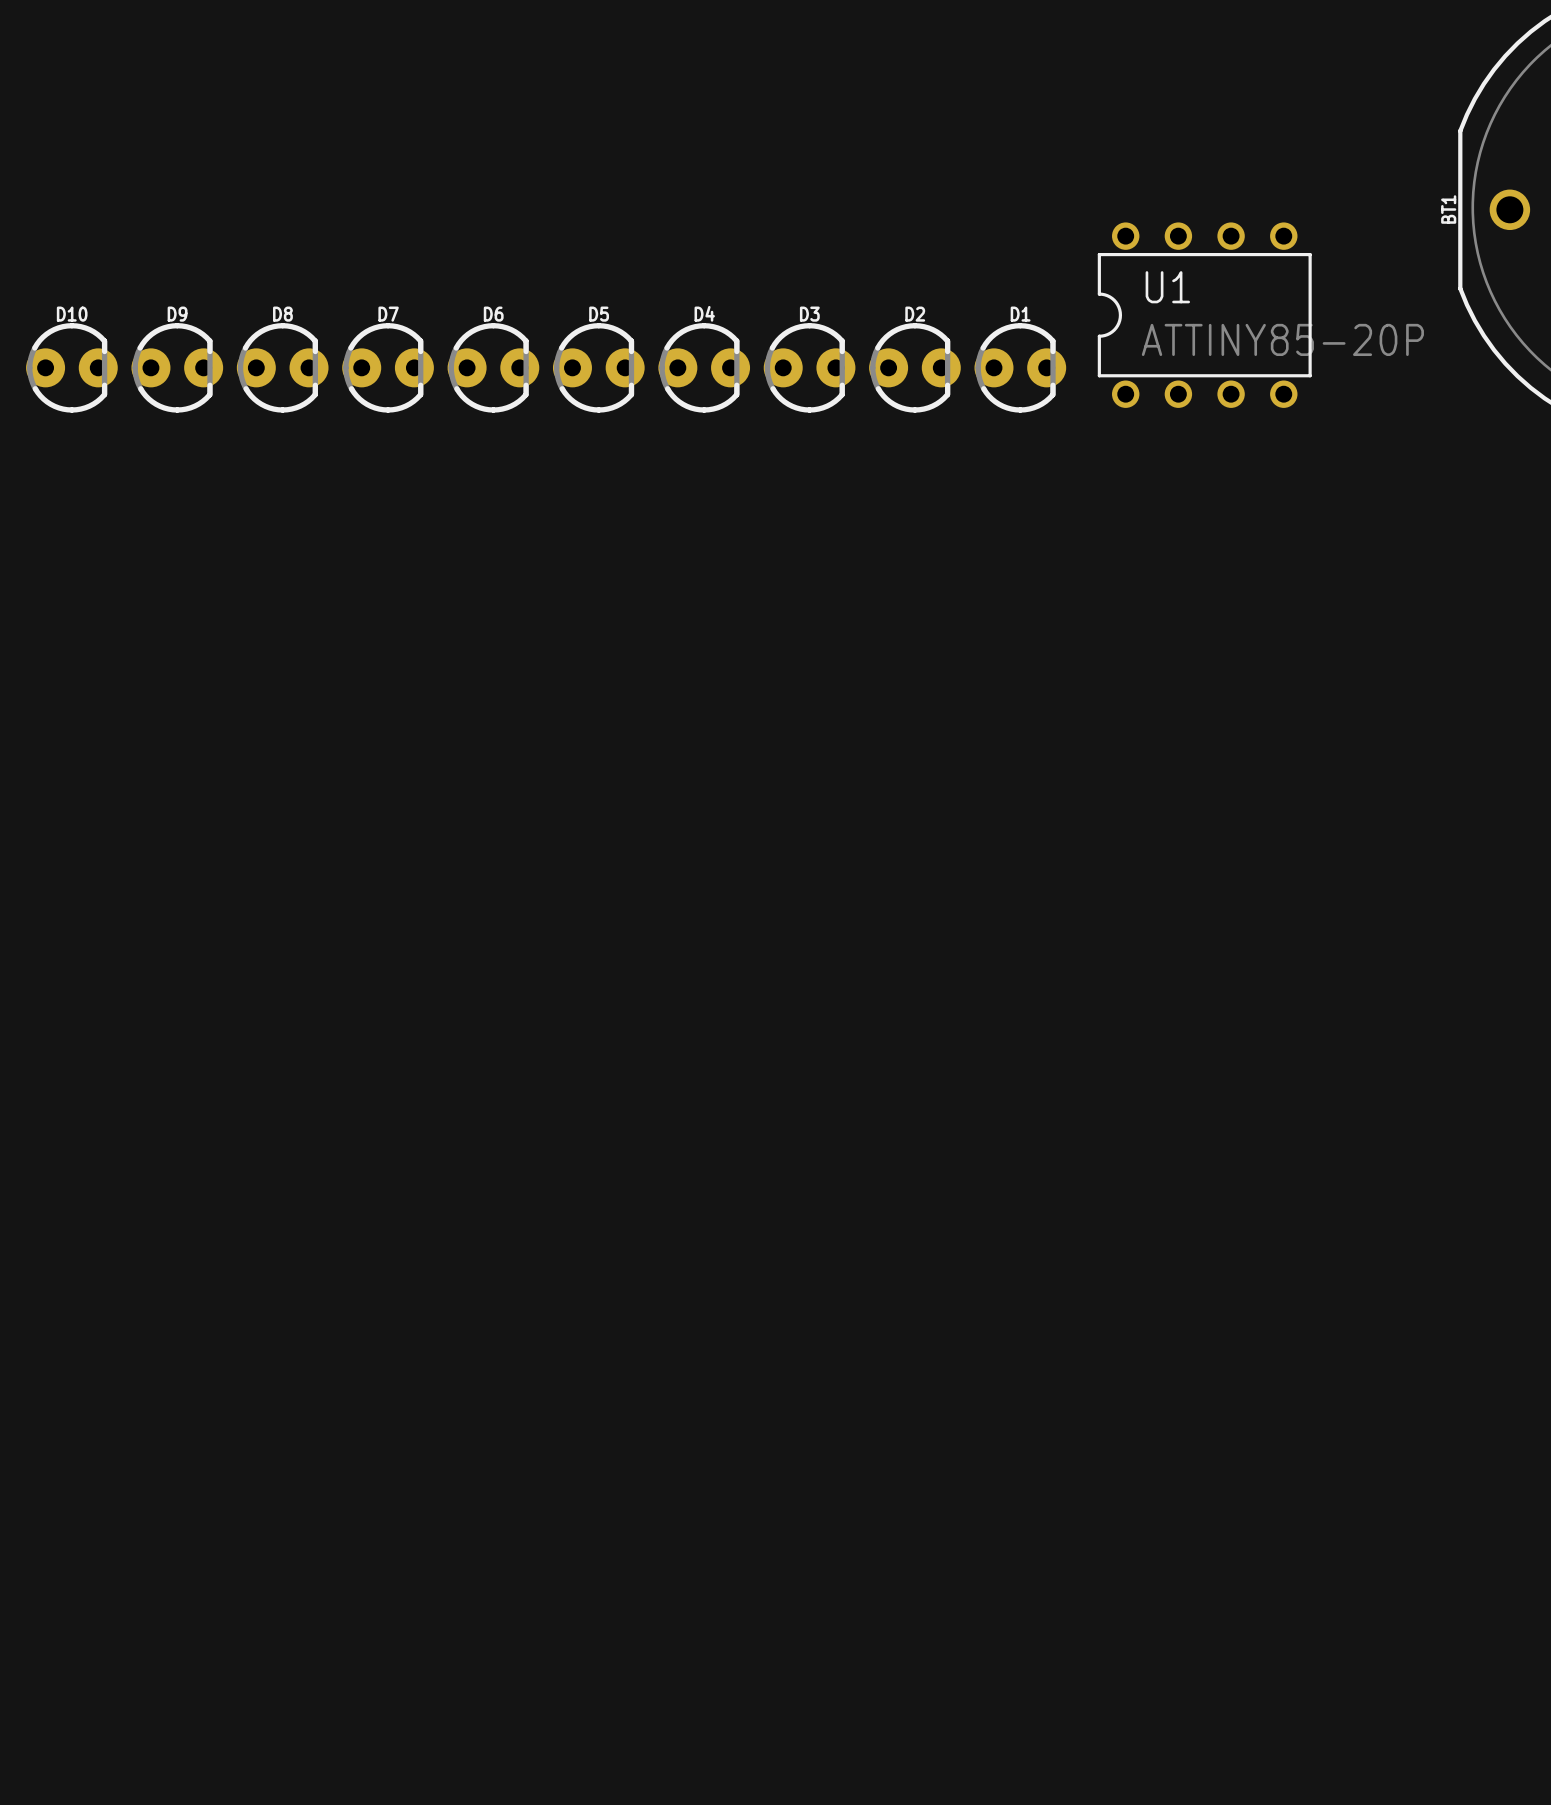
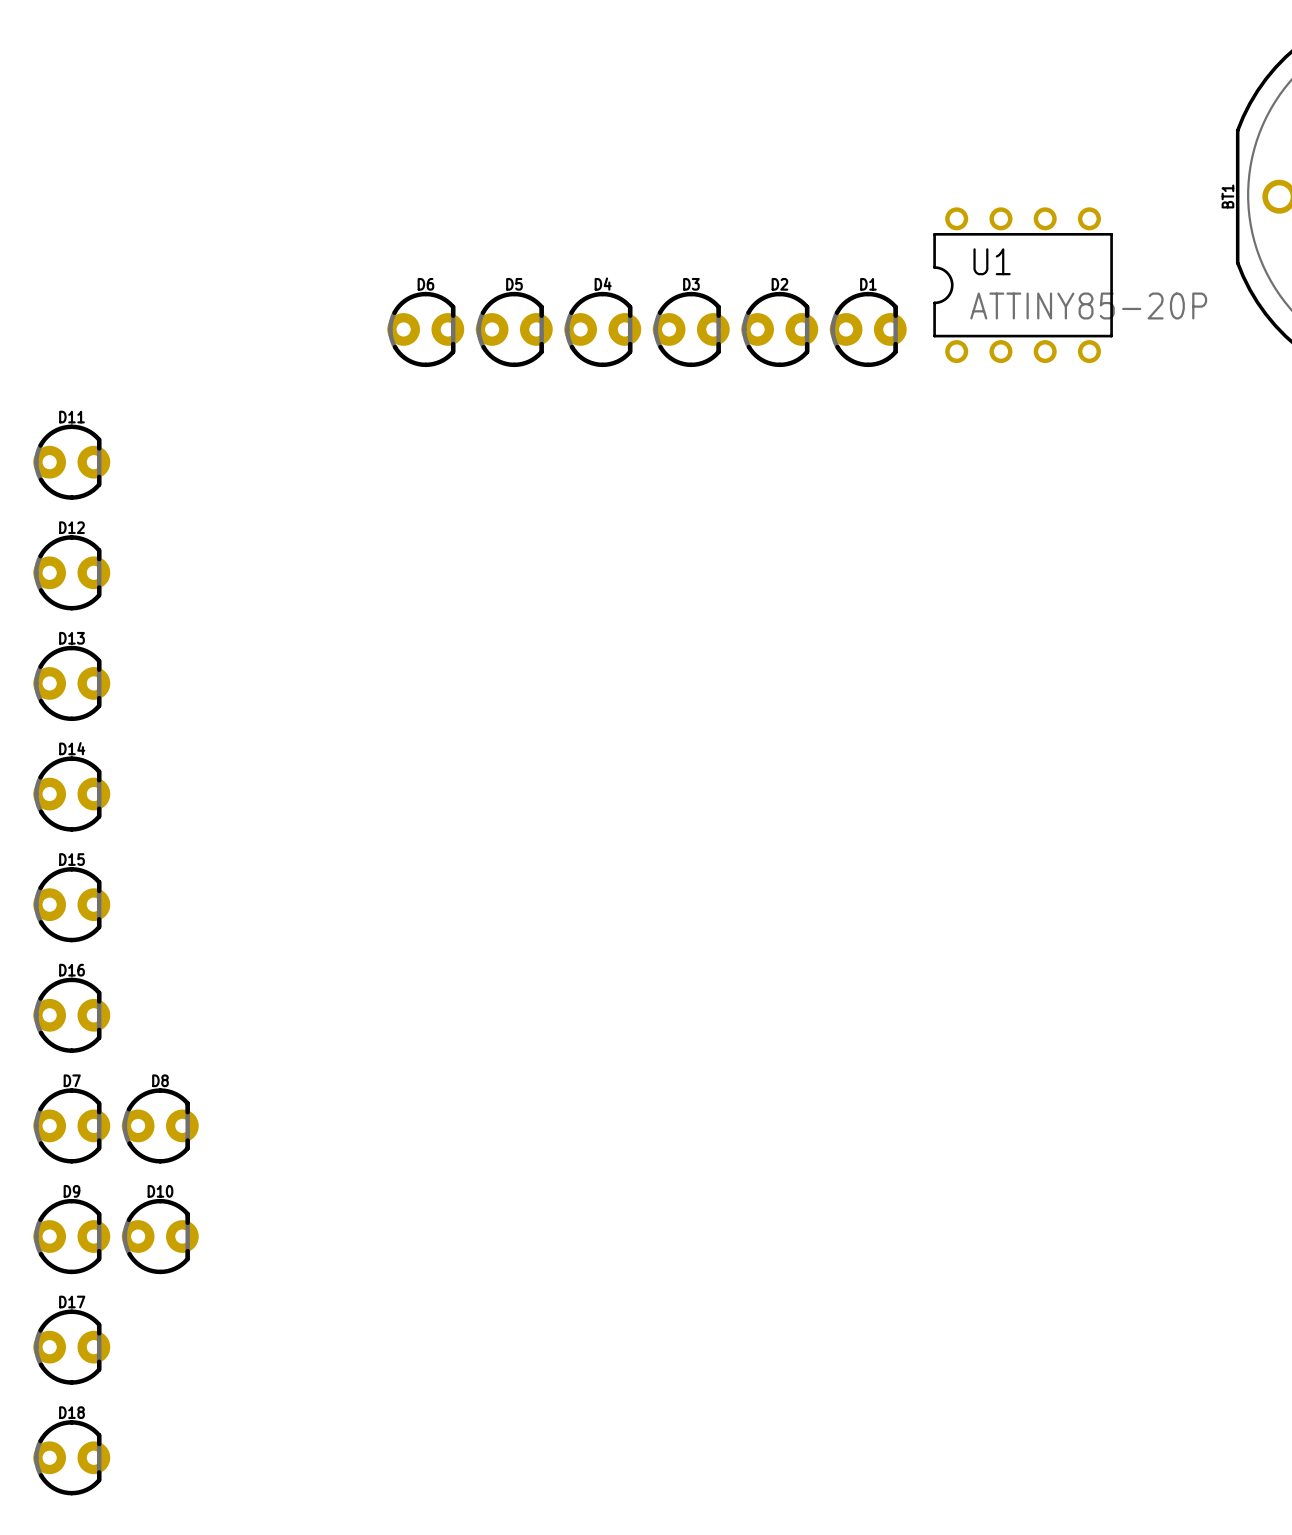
D10 position: (71, 367) -> (160, 1236)
D9 position: (177, 367) -> (71, 1236)
D8 position: (282, 367) -> (160, 1125)
D7 position: (388, 367) -> (71, 1125)
D11: none -> (71, 462)
D12: none -> (71, 572)
D13: none -> (71, 683)
D14: none -> (71, 794)
D15: none -> (71, 904)
D16: none -> (71, 1015)
D17: none -> (71, 1347)
D18: none -> (71, 1457)

